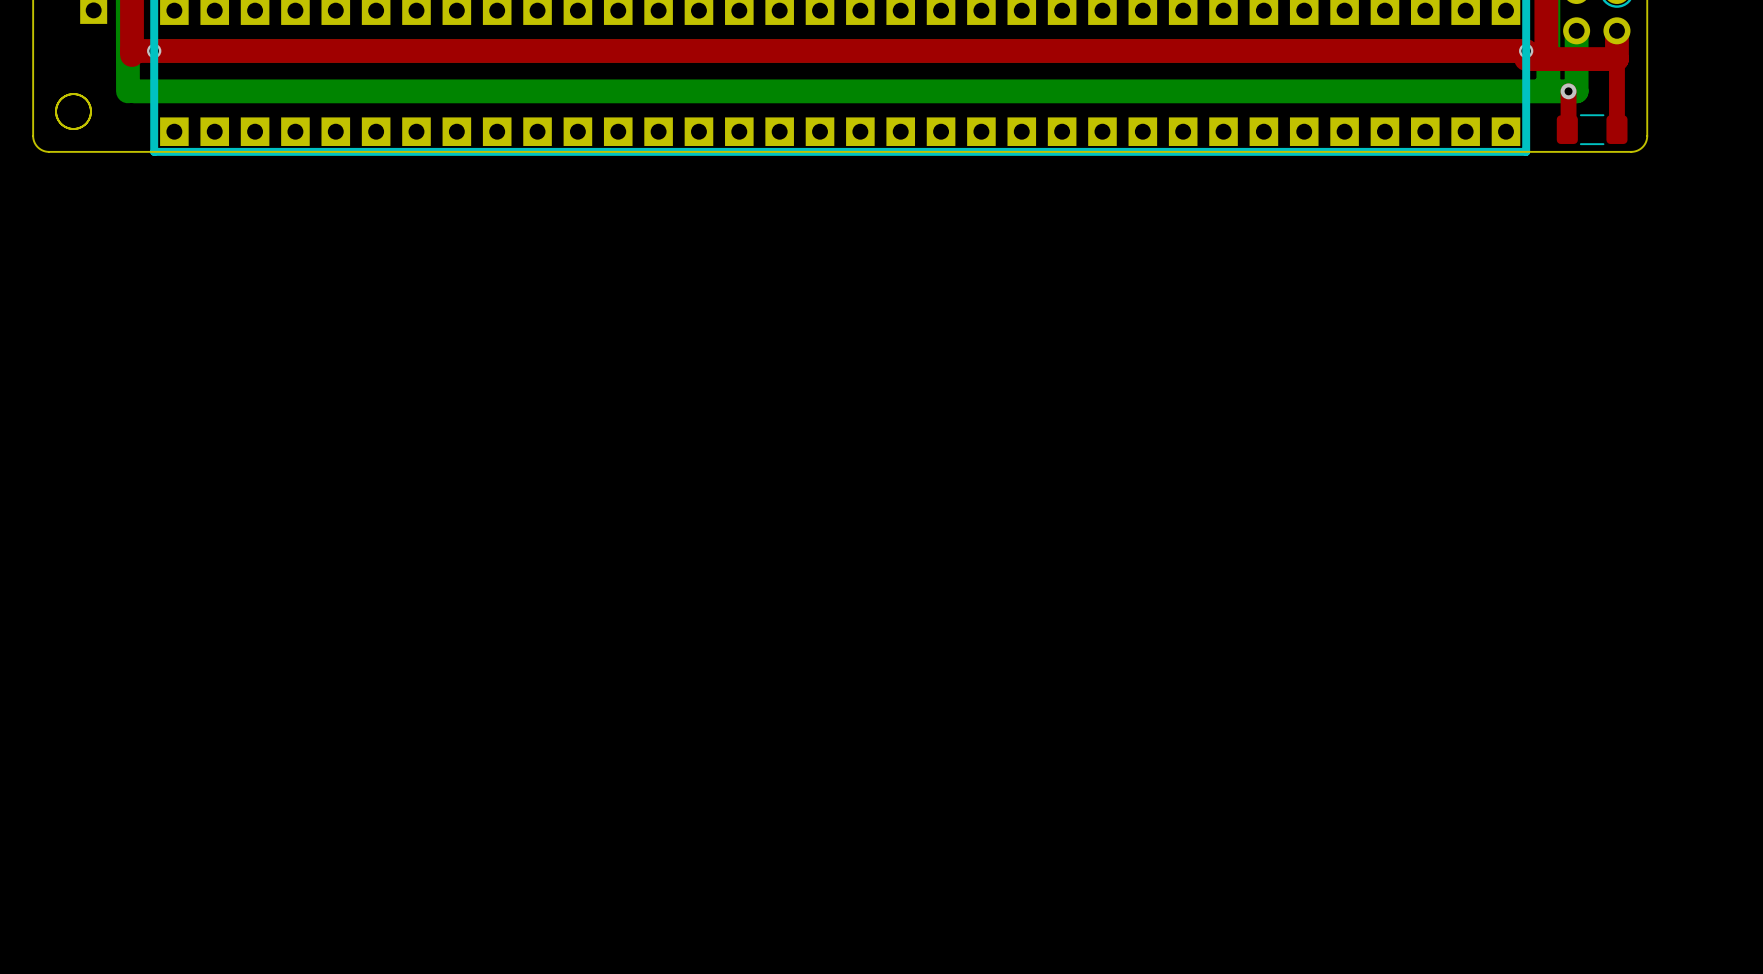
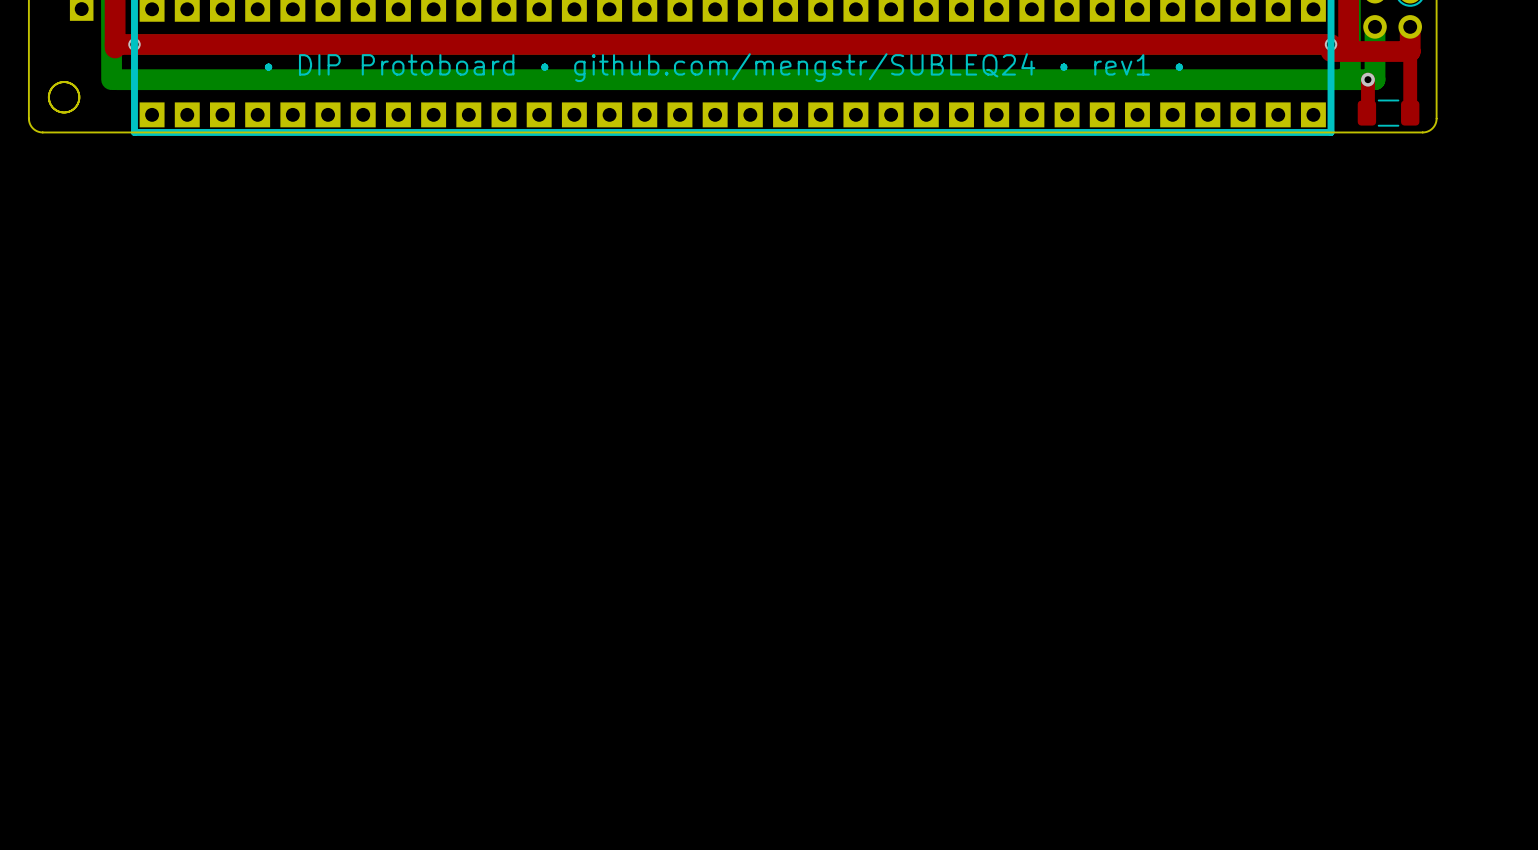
text: none -> • DIP Protoboard • github.com/mengstr/SUBLEQ24 • rev1 • (723, 67)

